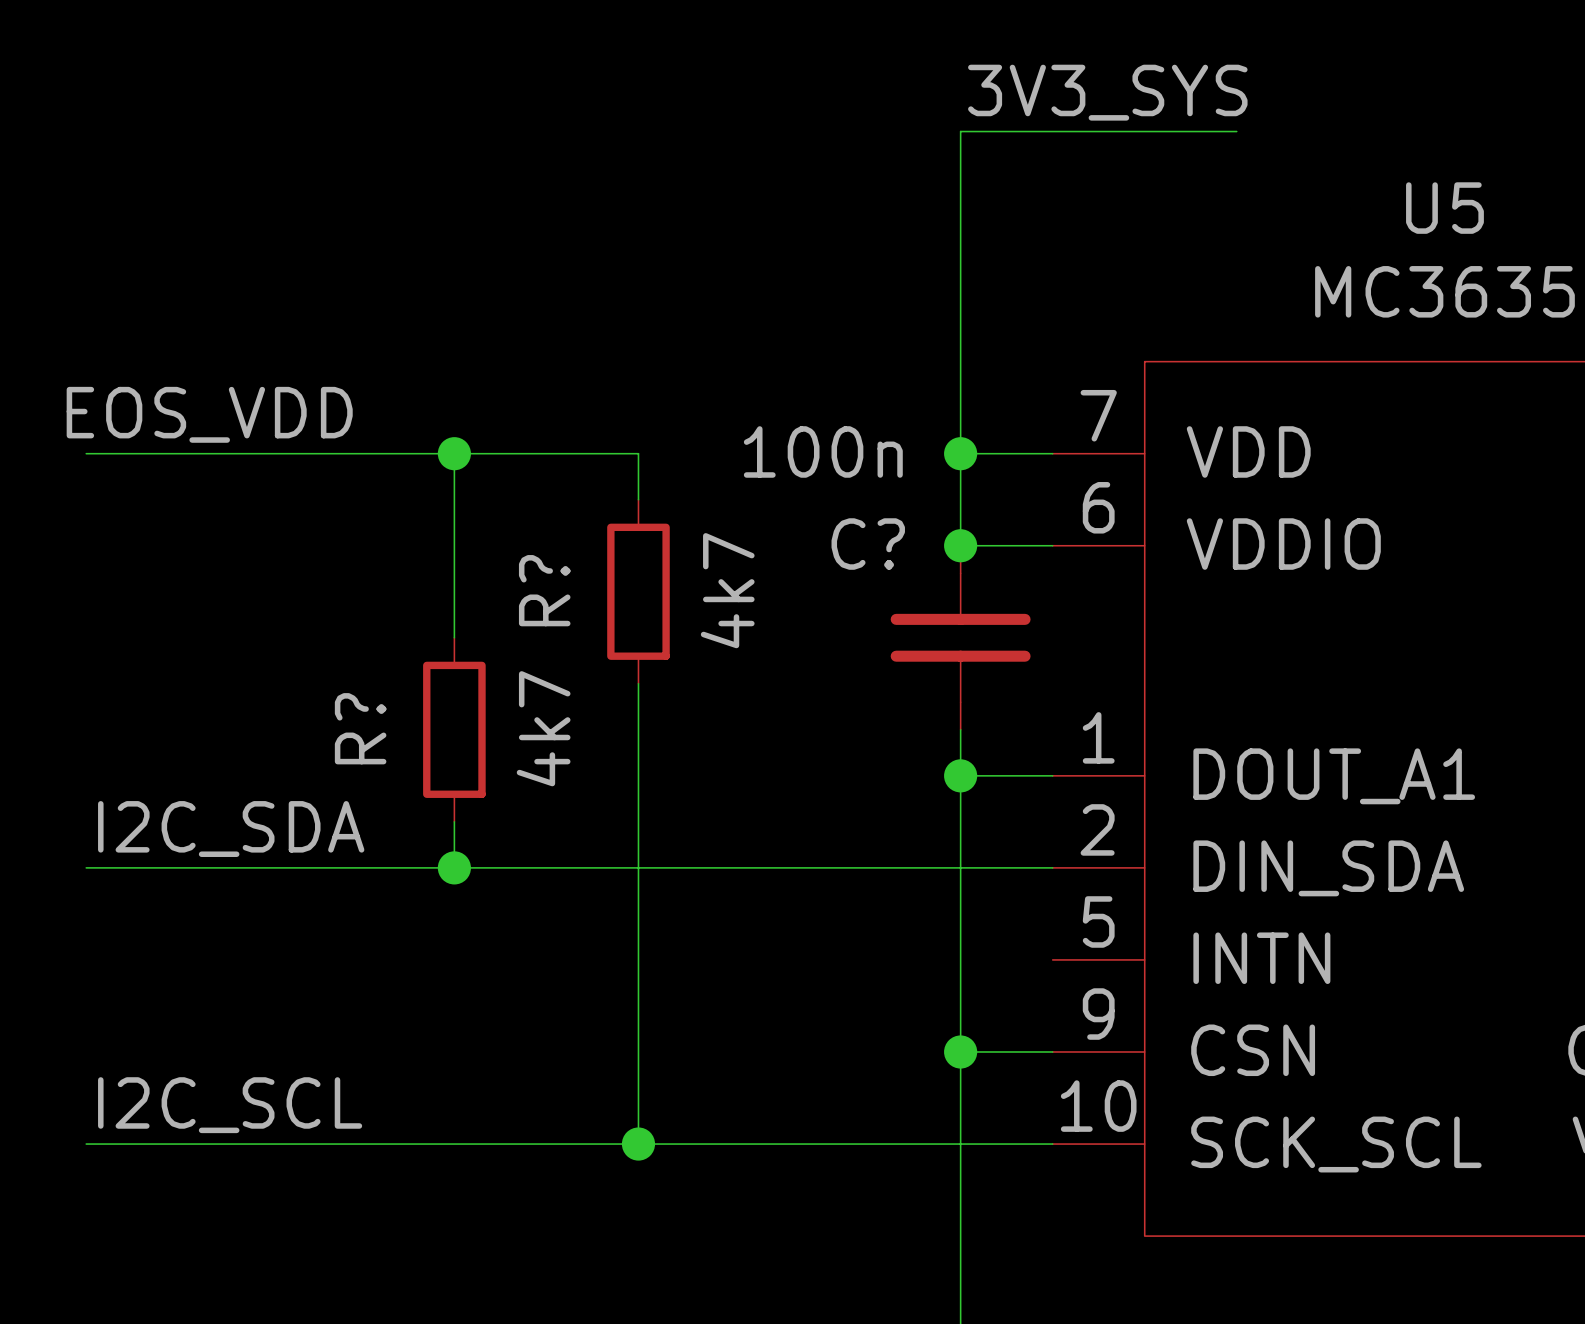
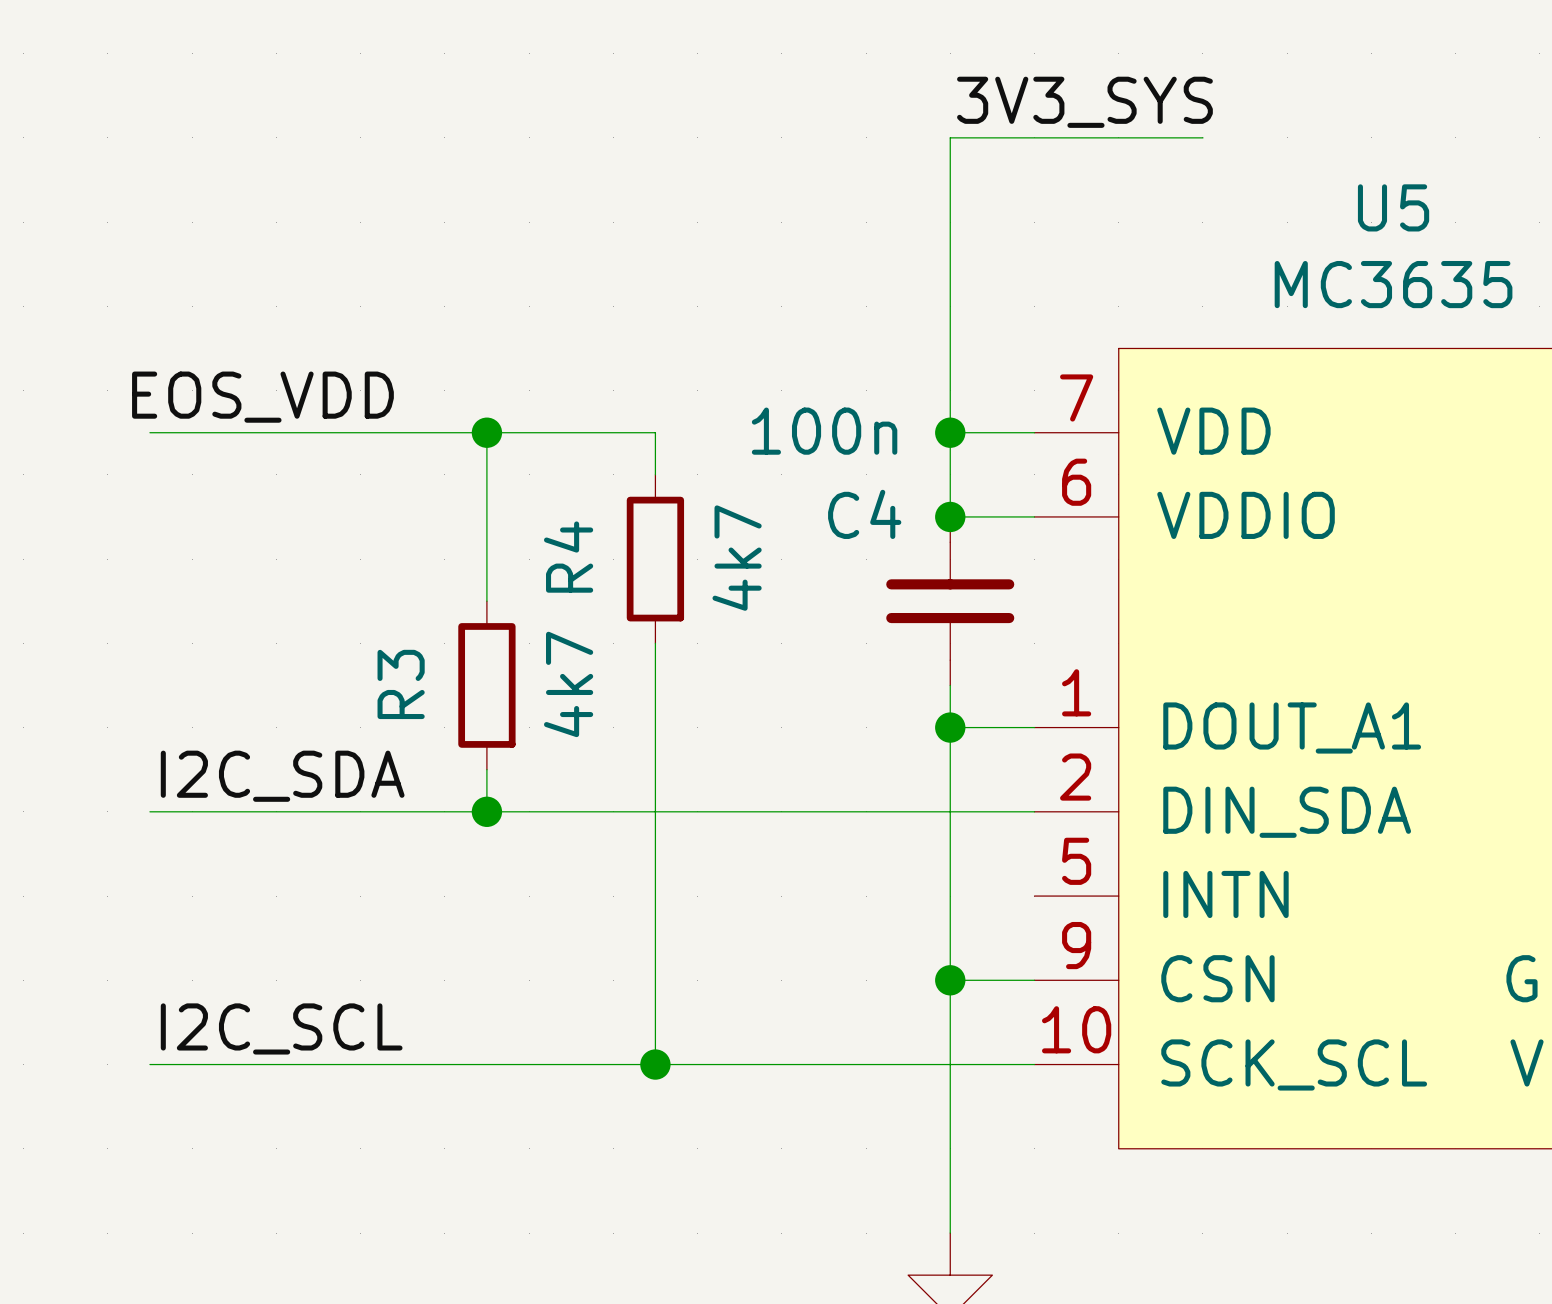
C? name: C? (868, 544) -> C4 (864, 514)
R? name: R? (544, 590) -> R4 (568, 557)
R? name: R? (360, 728) -> R3 (401, 684)

